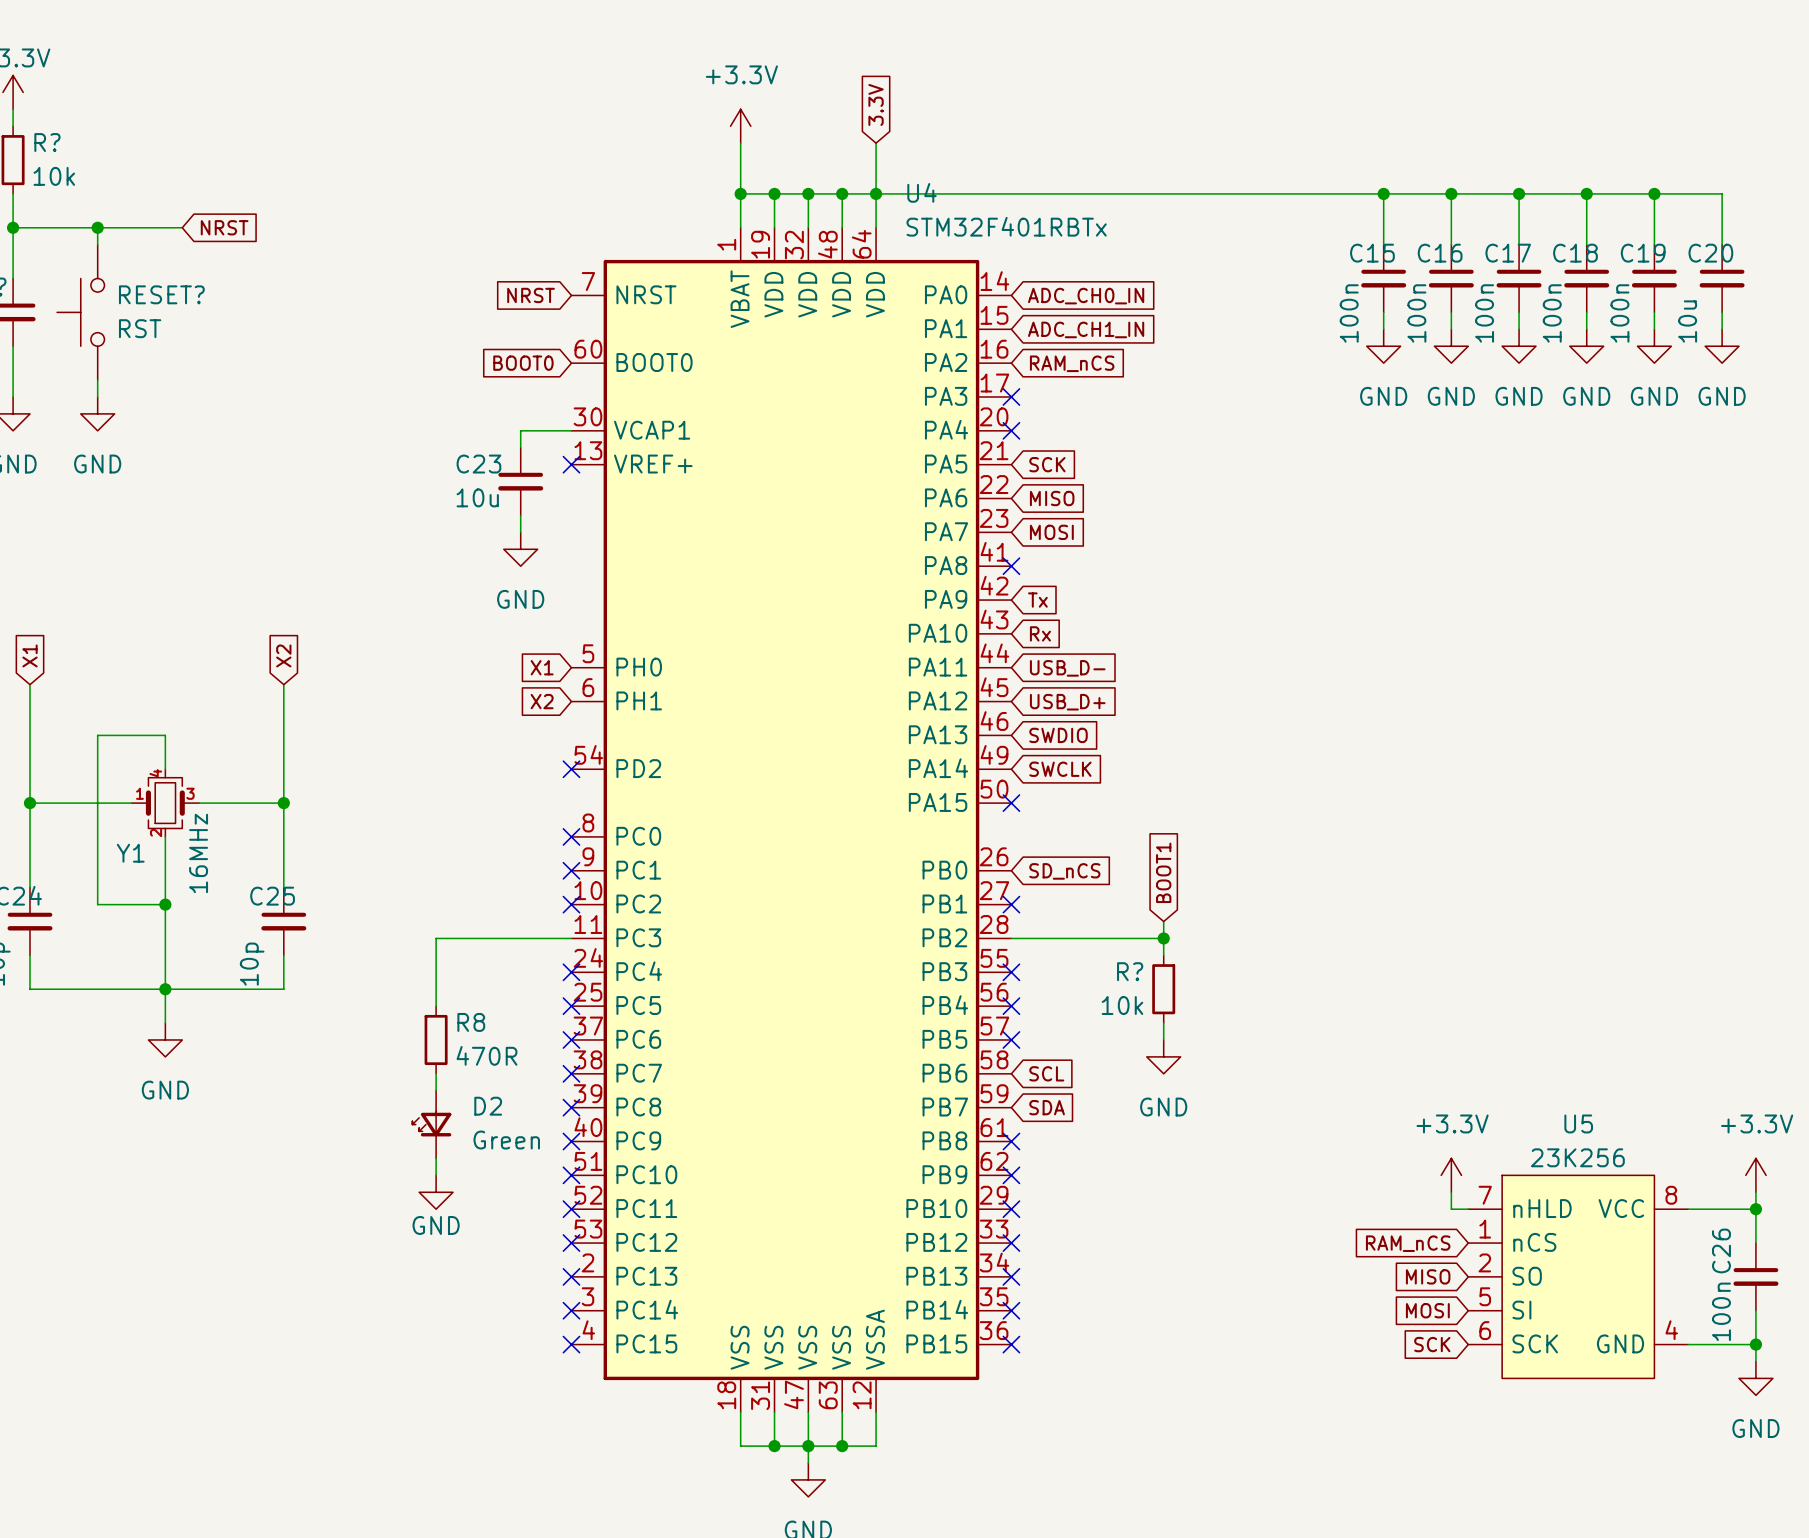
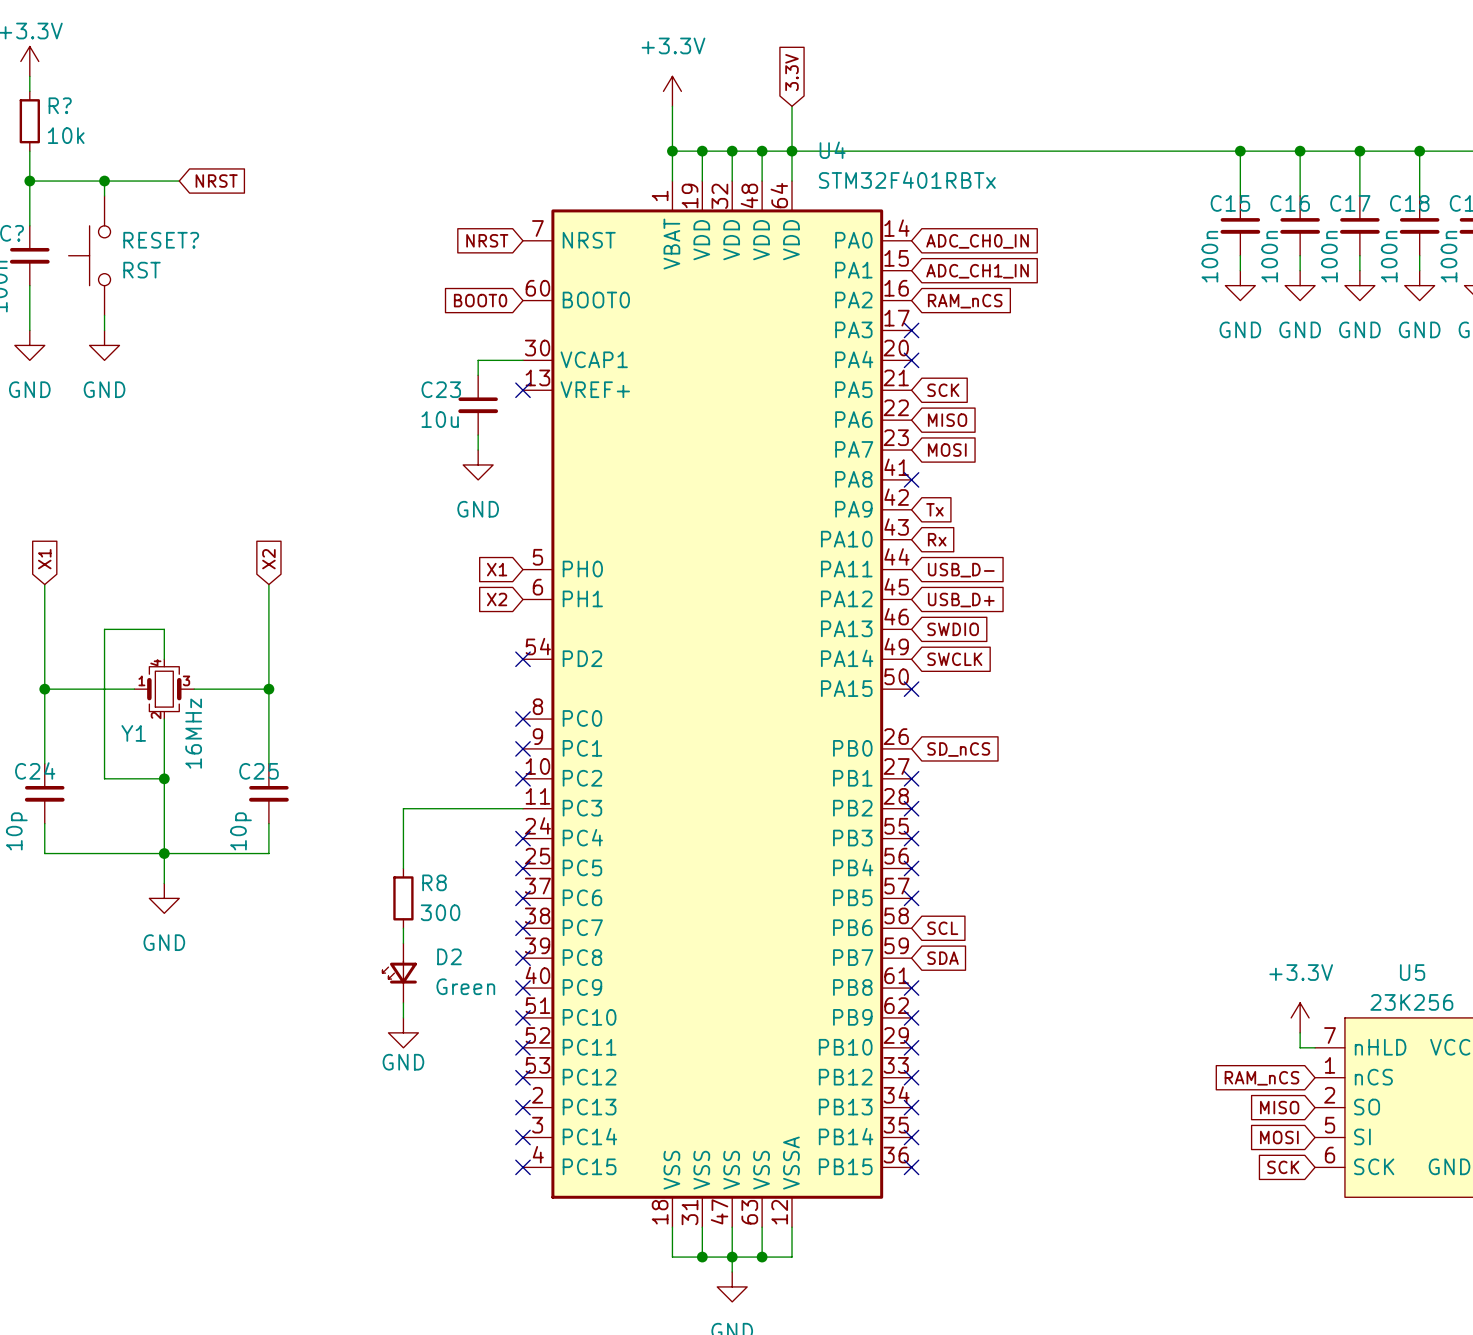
global label: BOOT1 (1163, 872) -> none
wire: (1163, 921) (1163, 955) -> none
wire: (1011, 938) (1163, 938) -> none
no-connect mark: none -> (911, 808)
junction: (1163, 938) -> none
R?: 10k (1163, 989) -> none
wire: (1163, 1023) (1163, 1039) -> none
R8 value: 470R (486, 1055) -> 300 (440, 912)
power symbol: GND (1163, 1056) -> none

